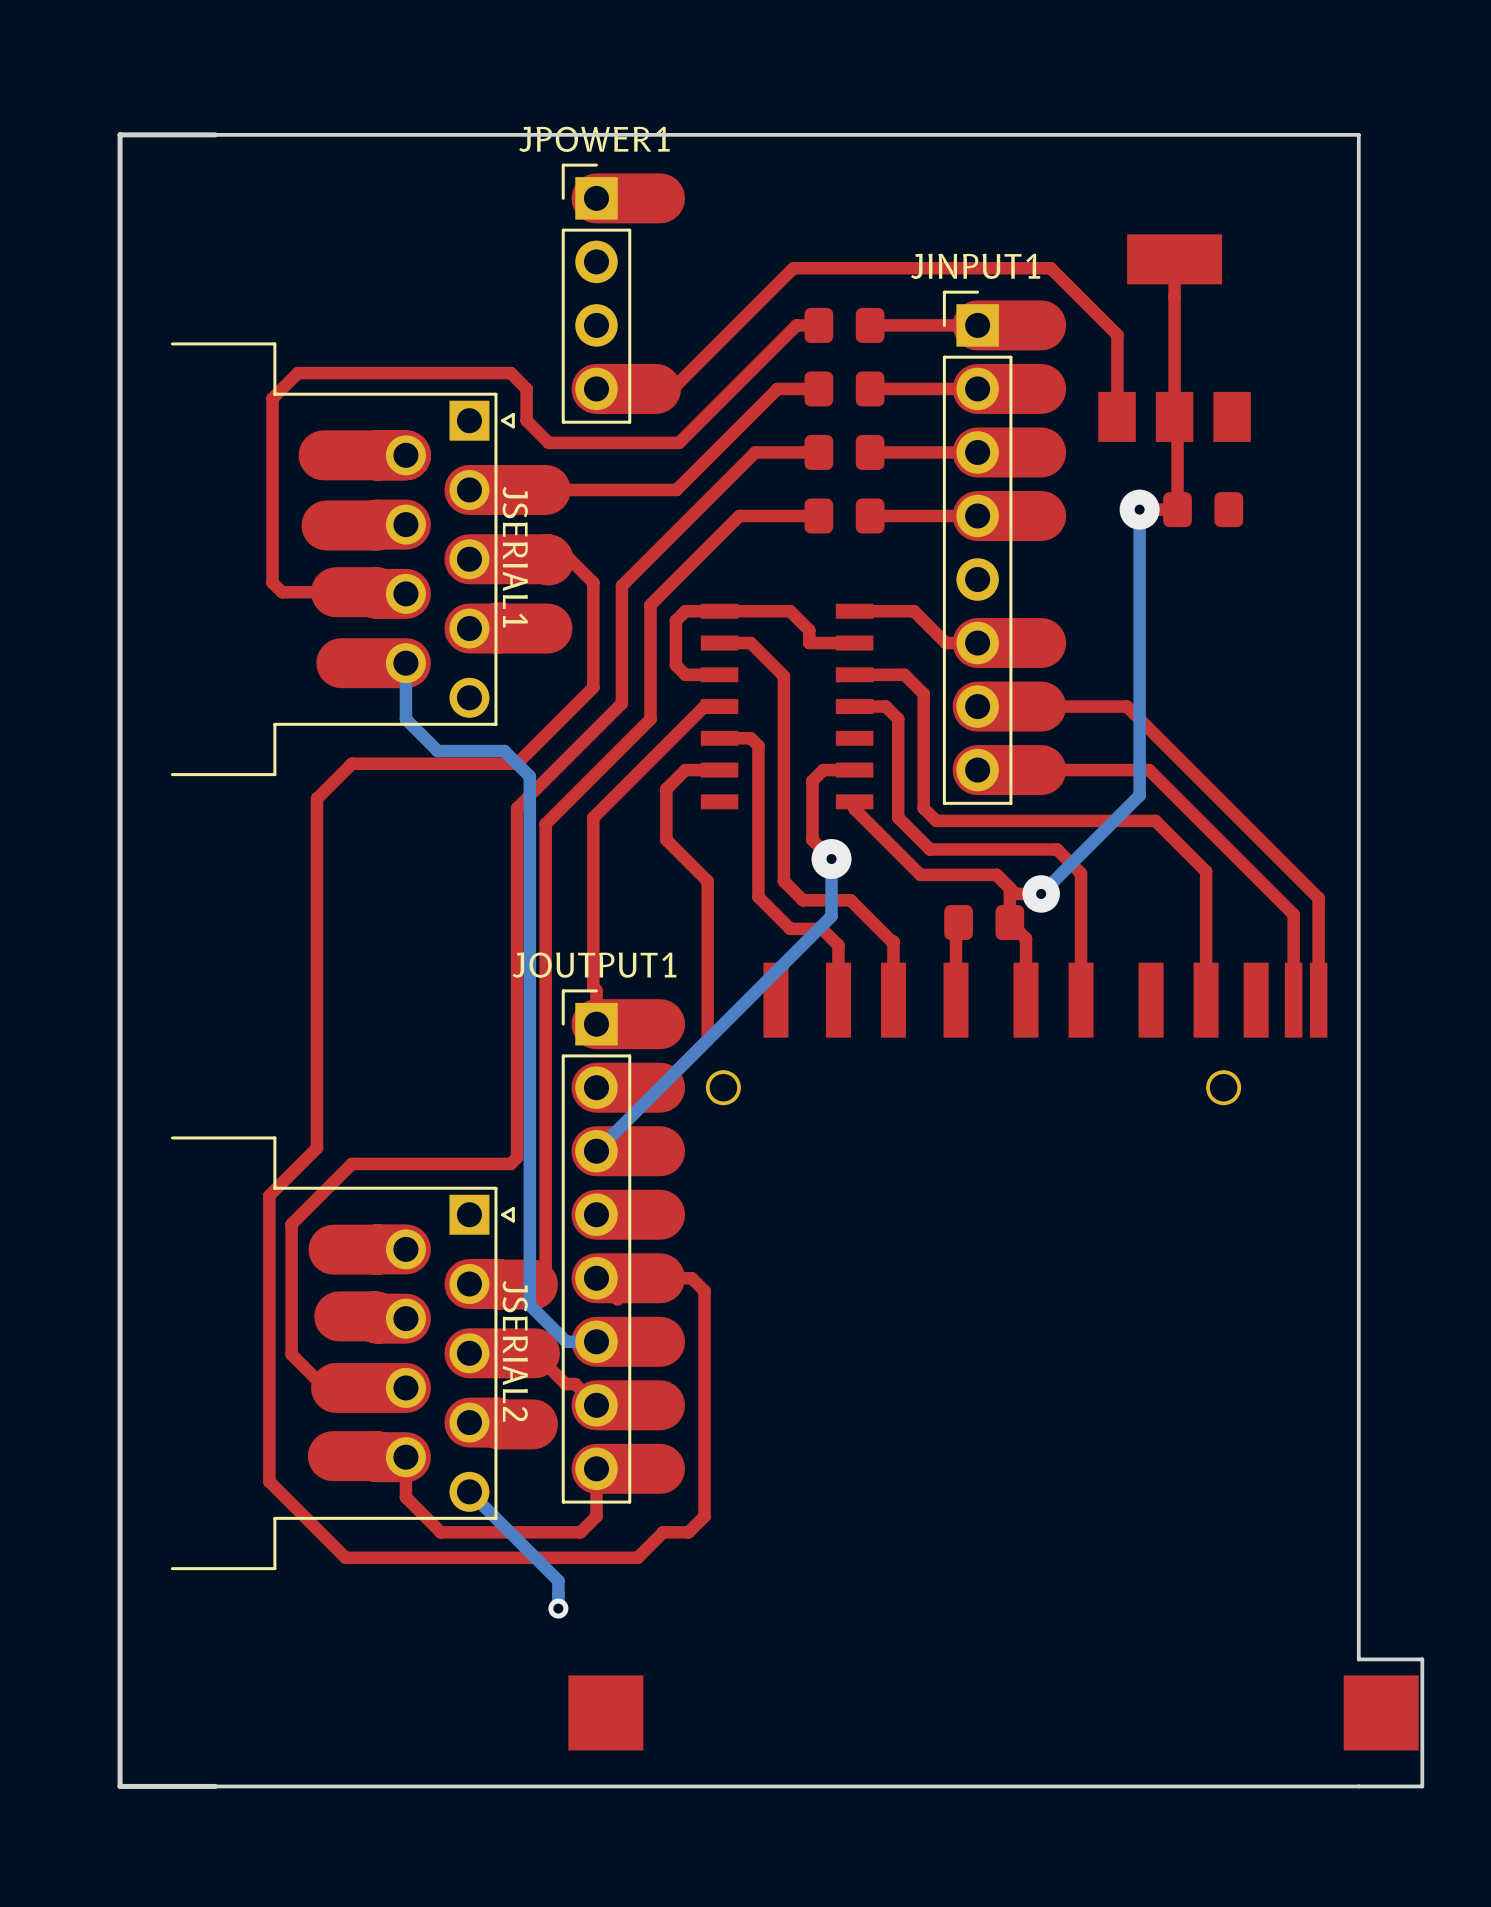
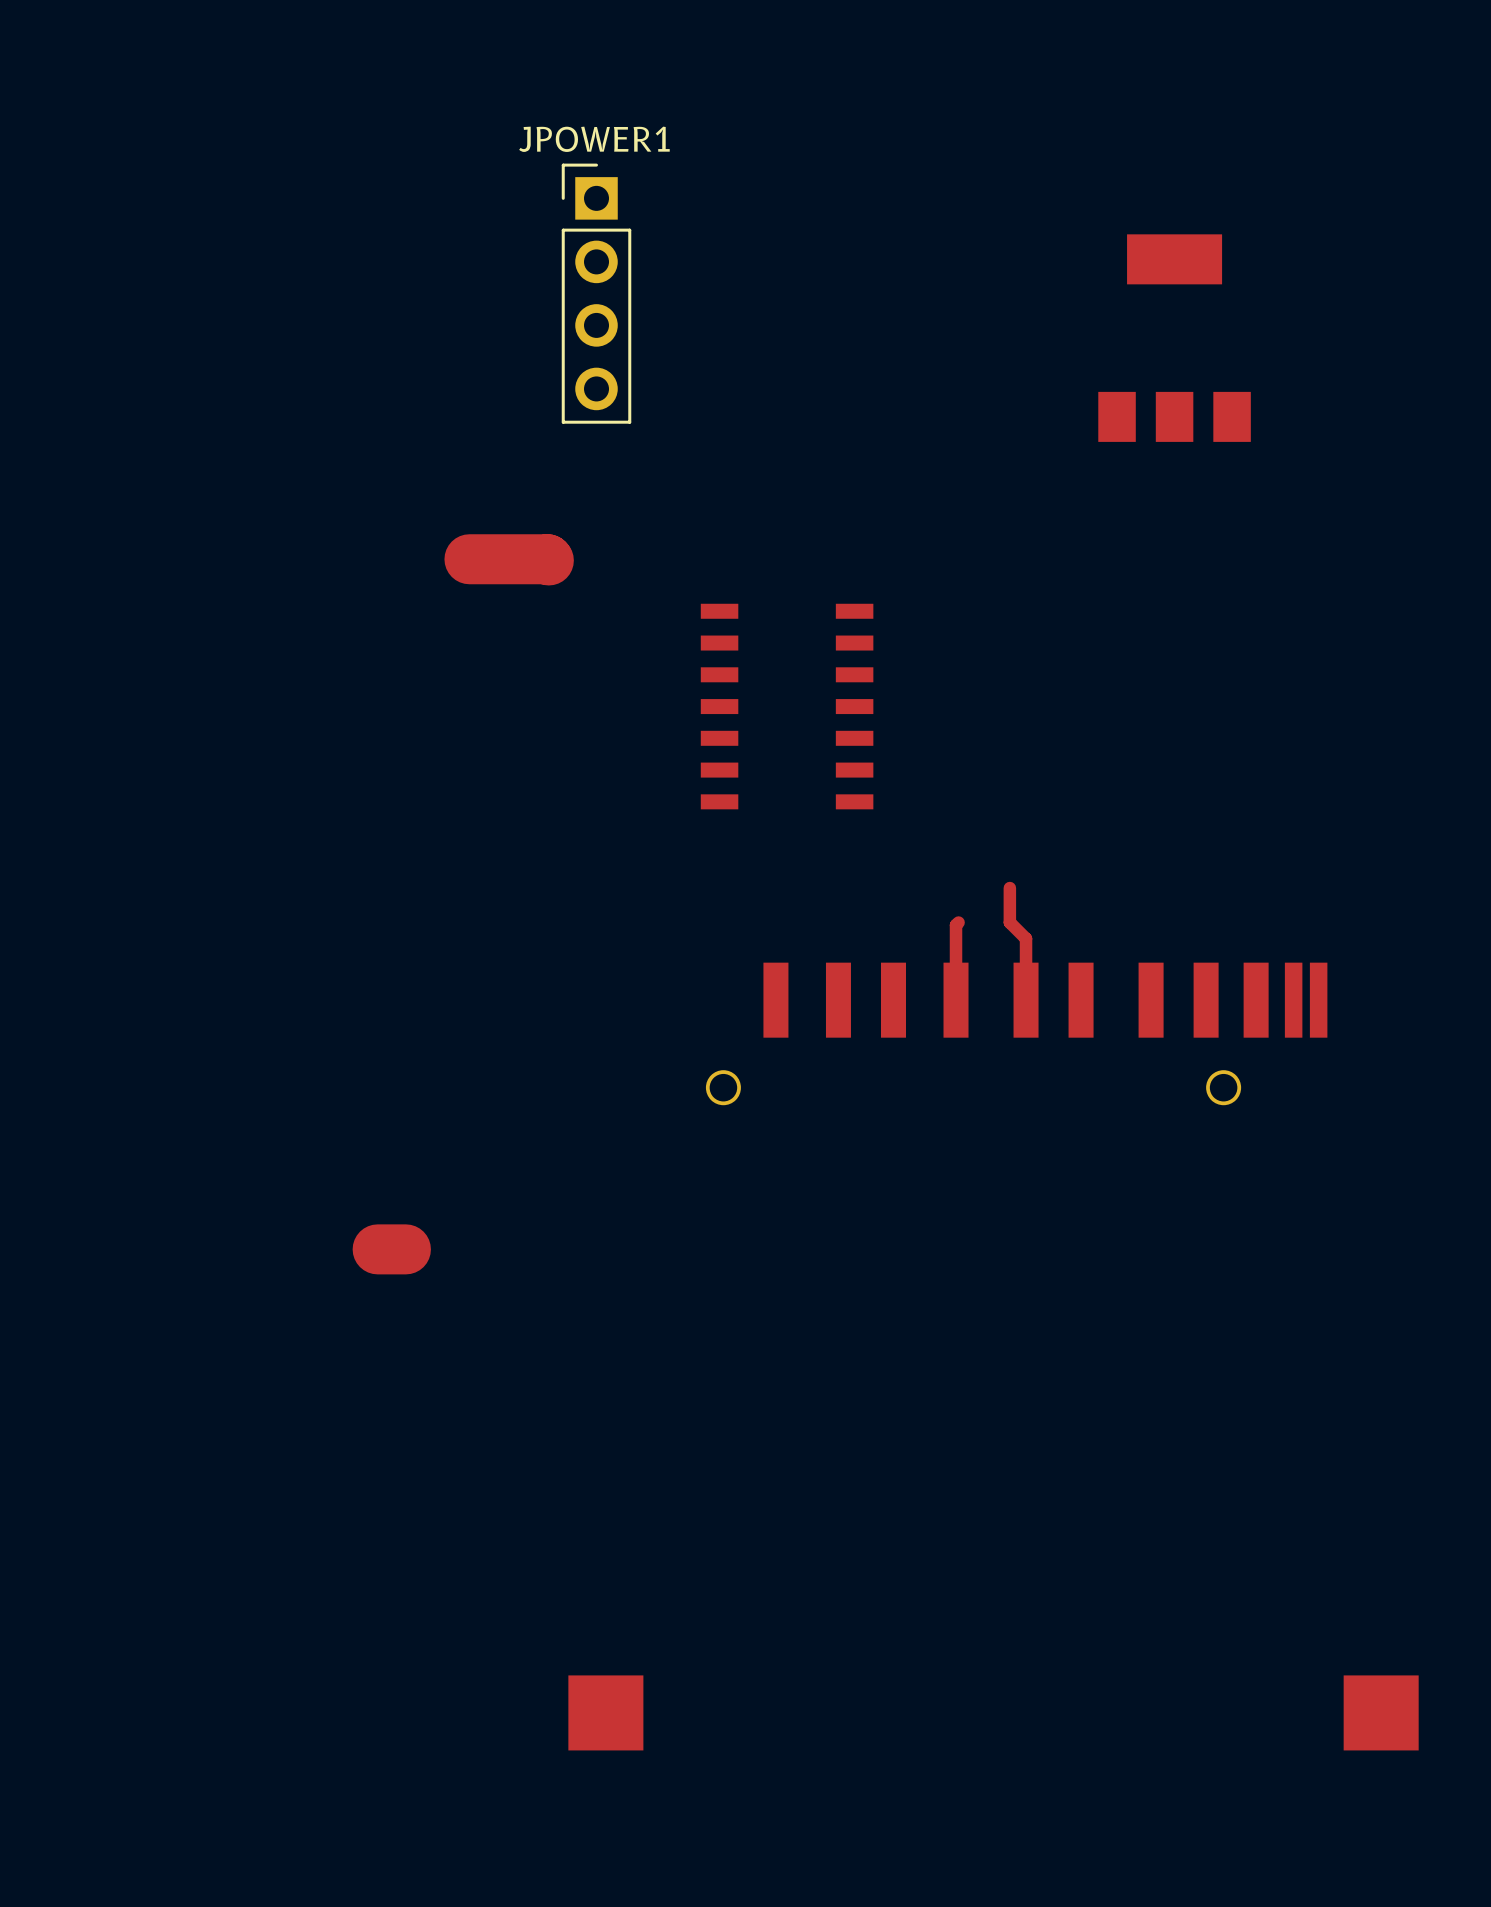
board edge: (1358, 134) (1358, 1659) (1422, 1659) (1422, 1786) (120, 1786) (120, 134) (1358, 134) -> none
top track: (660, 198) (596, 198) -> none
top track: (1174, 259) (1174, 416) (1177, 419) (1177, 509) (1139, 509) -> none
top track: (818, 325) (796, 325) (679, 442) (548, 442) (526, 420) (526, 388) (510, 373) (297, 373) (272, 398) (272, 582) (282, 592) (405, 593) -> none
part: (844, 325) -> none
top track: (1041, 325) (870, 325) -> none
top track: (596, 388) (672, 388) (793, 268) (1050, 268) (1117, 334) (1117, 410) -> none
top track: (818, 388) (777, 388) (676, 489) (469, 489) -> none
part: (844, 388) -> none
top track: (1041, 388) (870, 388) -> none
top track: (818, 452) (755, 452) (621, 585) (621, 703) (517, 808) (517, 1157) (510, 1163) (351, 1163) (291, 1224) (291, 1354) (325, 1387) (405, 1387) -> none
part: (844, 452) -> none
top track: (1041, 452) (870, 452) -> none
top track: (405, 455) (323, 455) -> none
bottom track: (1139, 509) (1139, 795) (1041, 893) -> none
via: (1139, 509) -> none
part: (1203, 509) -> none
top track: (818, 515) (739, 515) (650, 604) (650, 719) (545, 824) (545, 1271) (532, 1284) (469, 1284) -> none
part: (844, 515) -> none
top track: (1041, 515) (870, 515) -> none
top track: (405, 524) (326, 525) -> none
JINPUT1: (977, 547) -> none
JSERIAL1: (342, 559) -> none
top track: (547, 559) (569, 559) (593, 582) (593, 687) (517, 763) (351, 763) (317, 798) (317, 1148) (269, 1195) (269, 1481) (345, 1557) (637, 1557) (663, 1532) (688, 1532) (704, 1516) (704, 1290) (691, 1278) (596, 1278) (617, 1299) -> none
top track: (854, 611) (914, 611) (945, 643) (1041, 643) -> none
top track: (547, 628) (469, 628) -> none
top track: (719, 643) (750, 643) (783, 676) (783, 881) (802, 900) (850, 900) (893, 941) (893, 1000) -> none
top track: (854, 643) (809, 643) (809, 630) (790, 611) (685, 611) (675, 620) (675, 665) (685, 674) (719, 674) -> none
top track: (405, 663) (341, 663) -> none
bottom track: (405, 663) (405, 719) (437, 751) (504, 751) (529, 776) (529, 1305) (566, 1341) (596, 1341) -> none
top track: (854, 674) (904, 674) (923, 693) (923, 808) (936, 820) (1155, 820) (1206, 871) (1206, 1000) -> none
top track: (719, 706) (704, 706) (593, 817) (593, 987) (596, 990) (596, 1024) (660, 1024) -> none
top track: (854, 706) (885, 706) (898, 718) (898, 817) (930, 849) (1057, 849) (1081, 873) (1081, 1000) -> none
top track: (977, 706) (1126, 706) (1318, 898) (1318, 1000) -> none
top track: (719, 738) (750, 738) (758, 745) (758, 897) (790, 928) (822, 928) (838, 945) (838, 1000) -> none
top track: (719, 770) (685, 770) (666, 789) (666, 839) (707, 881) (707, 1040) (660, 1087) (596, 1087) -> none
top track: (854, 770) (823, 770) (812, 780) (812, 839) (831, 859) -> none
top track: (977, 770) (1149, 770) (1293, 914) (1293, 1000) -> none
top track: (854, 801) (854, 809) (920, 874) (996, 874) (1015, 893) (1041, 893) -> none
bottom track: (831, 859) (831, 916) (596, 1151) -> none
via: (831, 859) -> none
via: (1041, 893) -> none
part: (984, 922) -> none
top track: (660, 1151) (596, 1151) -> none
top track: (660, 1214) (596, 1214) -> none
JOUTPUT1: (596, 1246) -> none
top track: (377, 1249) (333, 1249) -> none
top track: (339, 1316) (405, 1318) -> none
top track: (660, 1341) (596, 1341) -> none
JSERIAL2: (342, 1353) -> none
top track: (469, 1353) (534, 1353) (565, 1384) (575, 1384) (596, 1405) (660, 1405) -> none
top track: (469, 1422) (532, 1424) -> none
top track: (332, 1456) (405, 1457) (405, 1497) (440, 1532) (580, 1532) (596, 1516) (596, 1468) (660, 1468) -> none
bottom track: (469, 1491) (558, 1580) (558, 1608) -> none
via: (558, 1608) -> none

